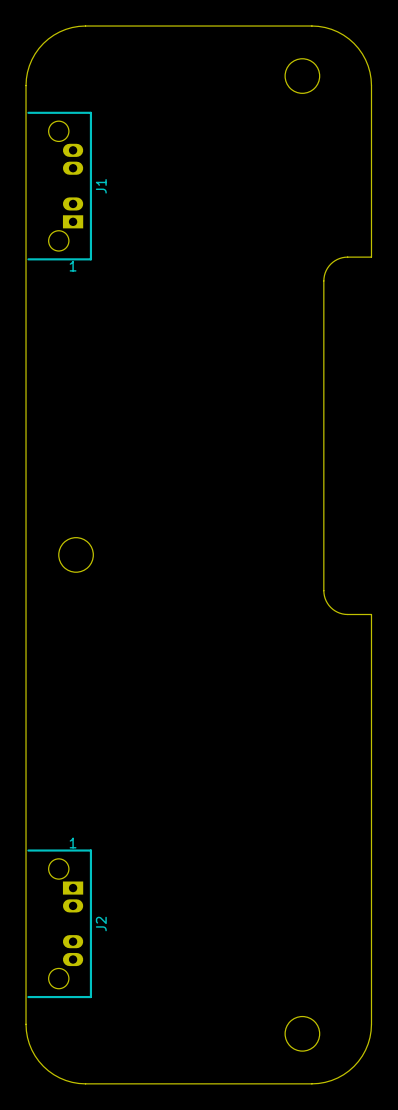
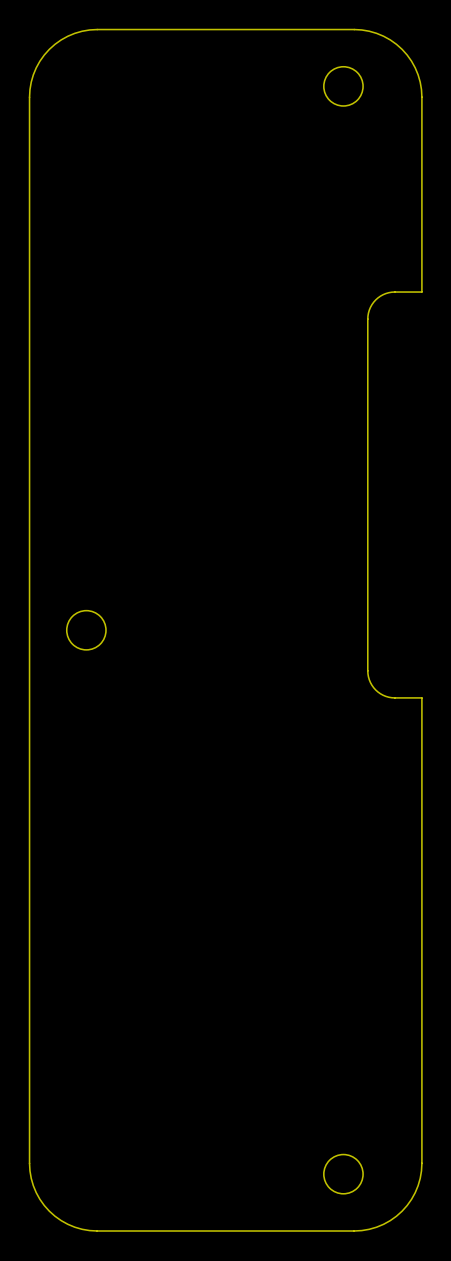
J1: (59, 186) -> none
J2: (59, 923) -> none

